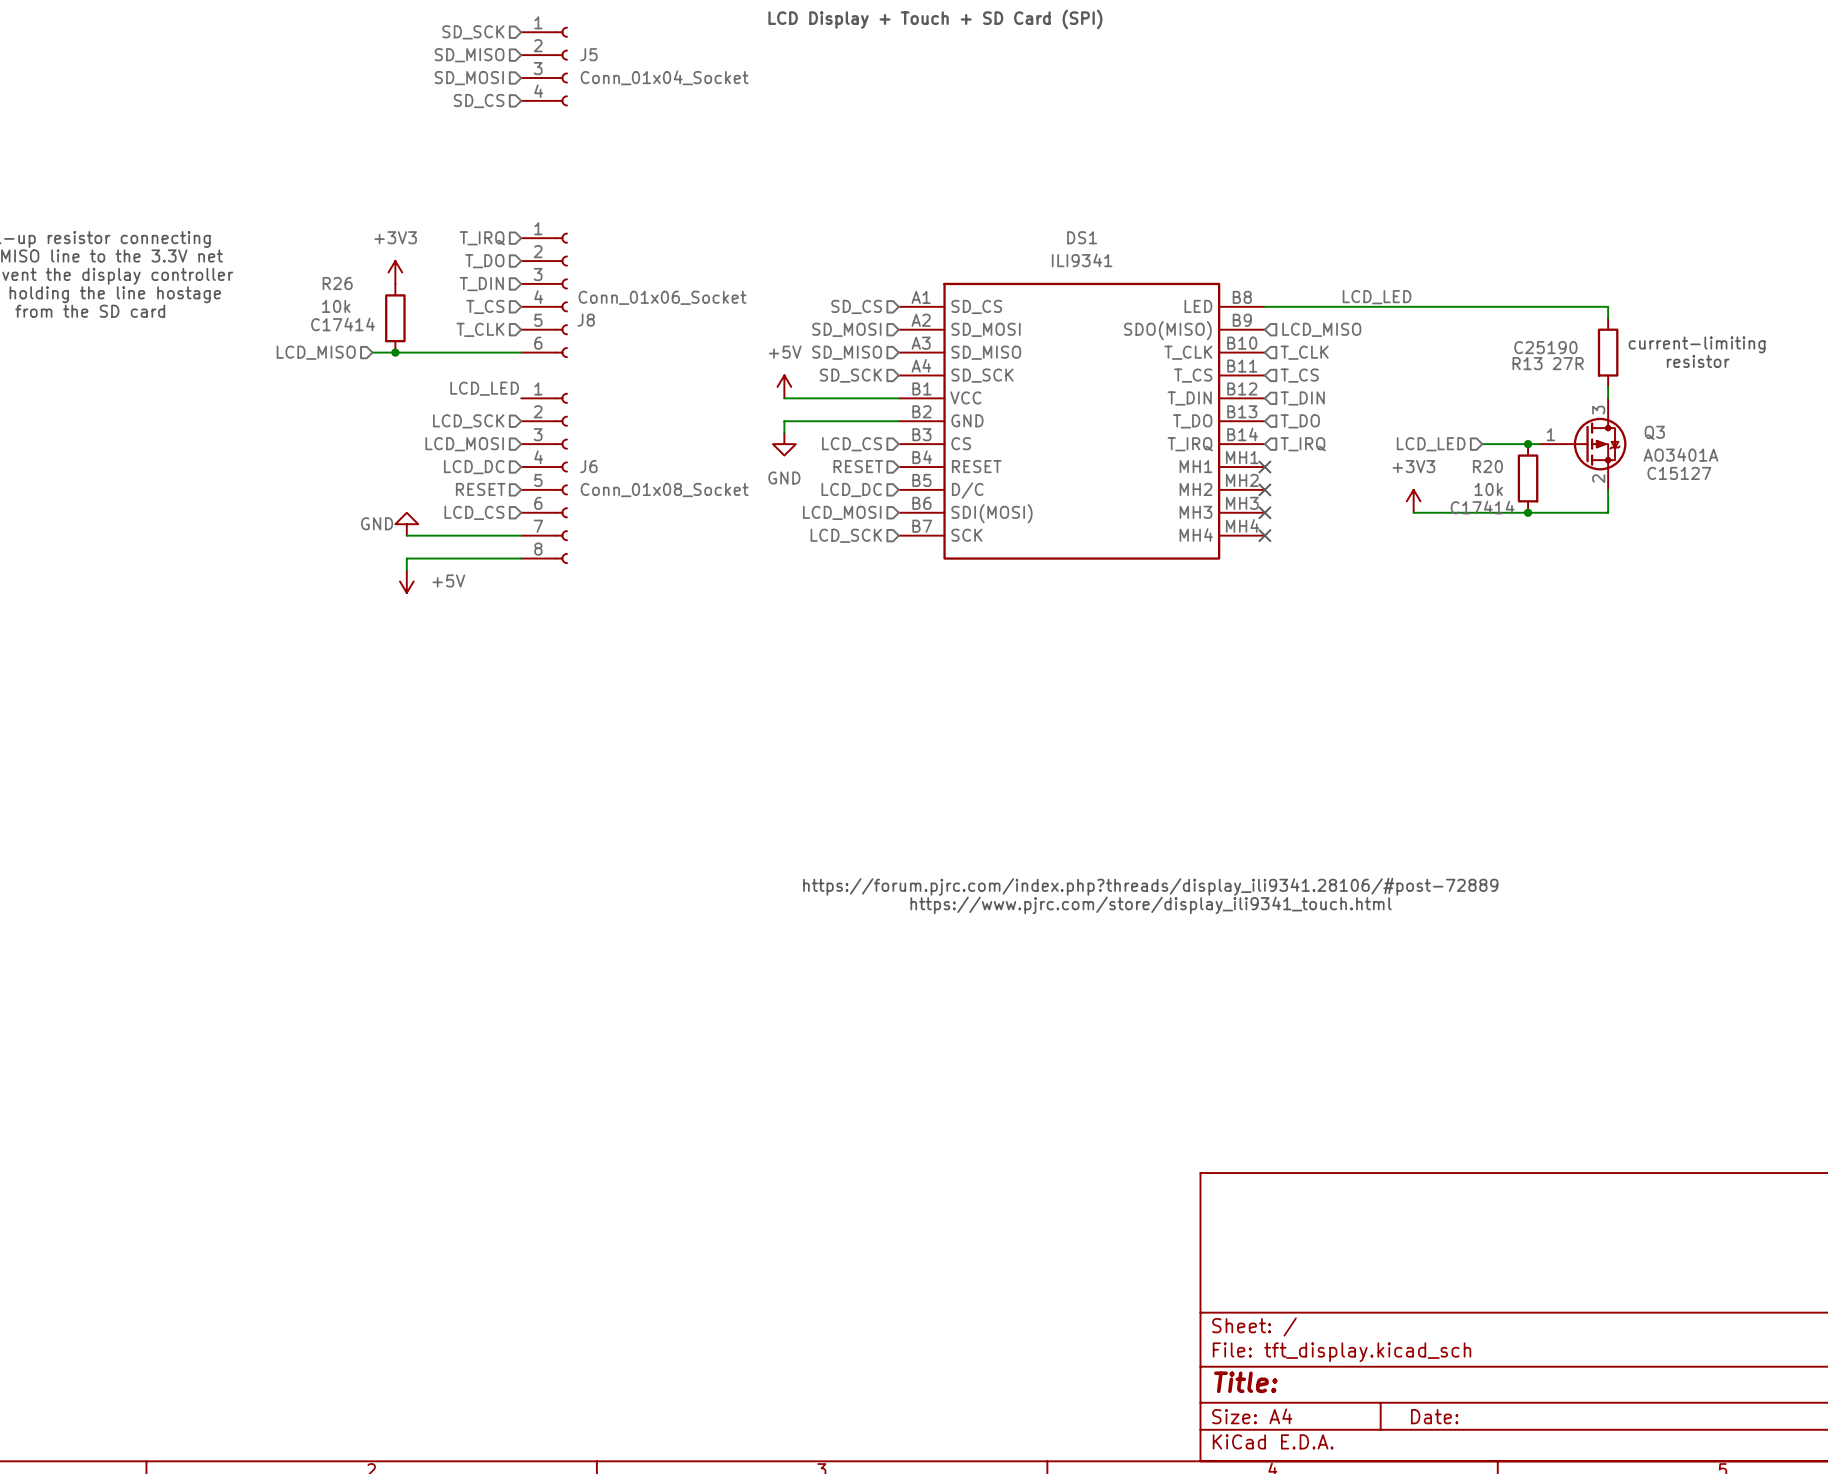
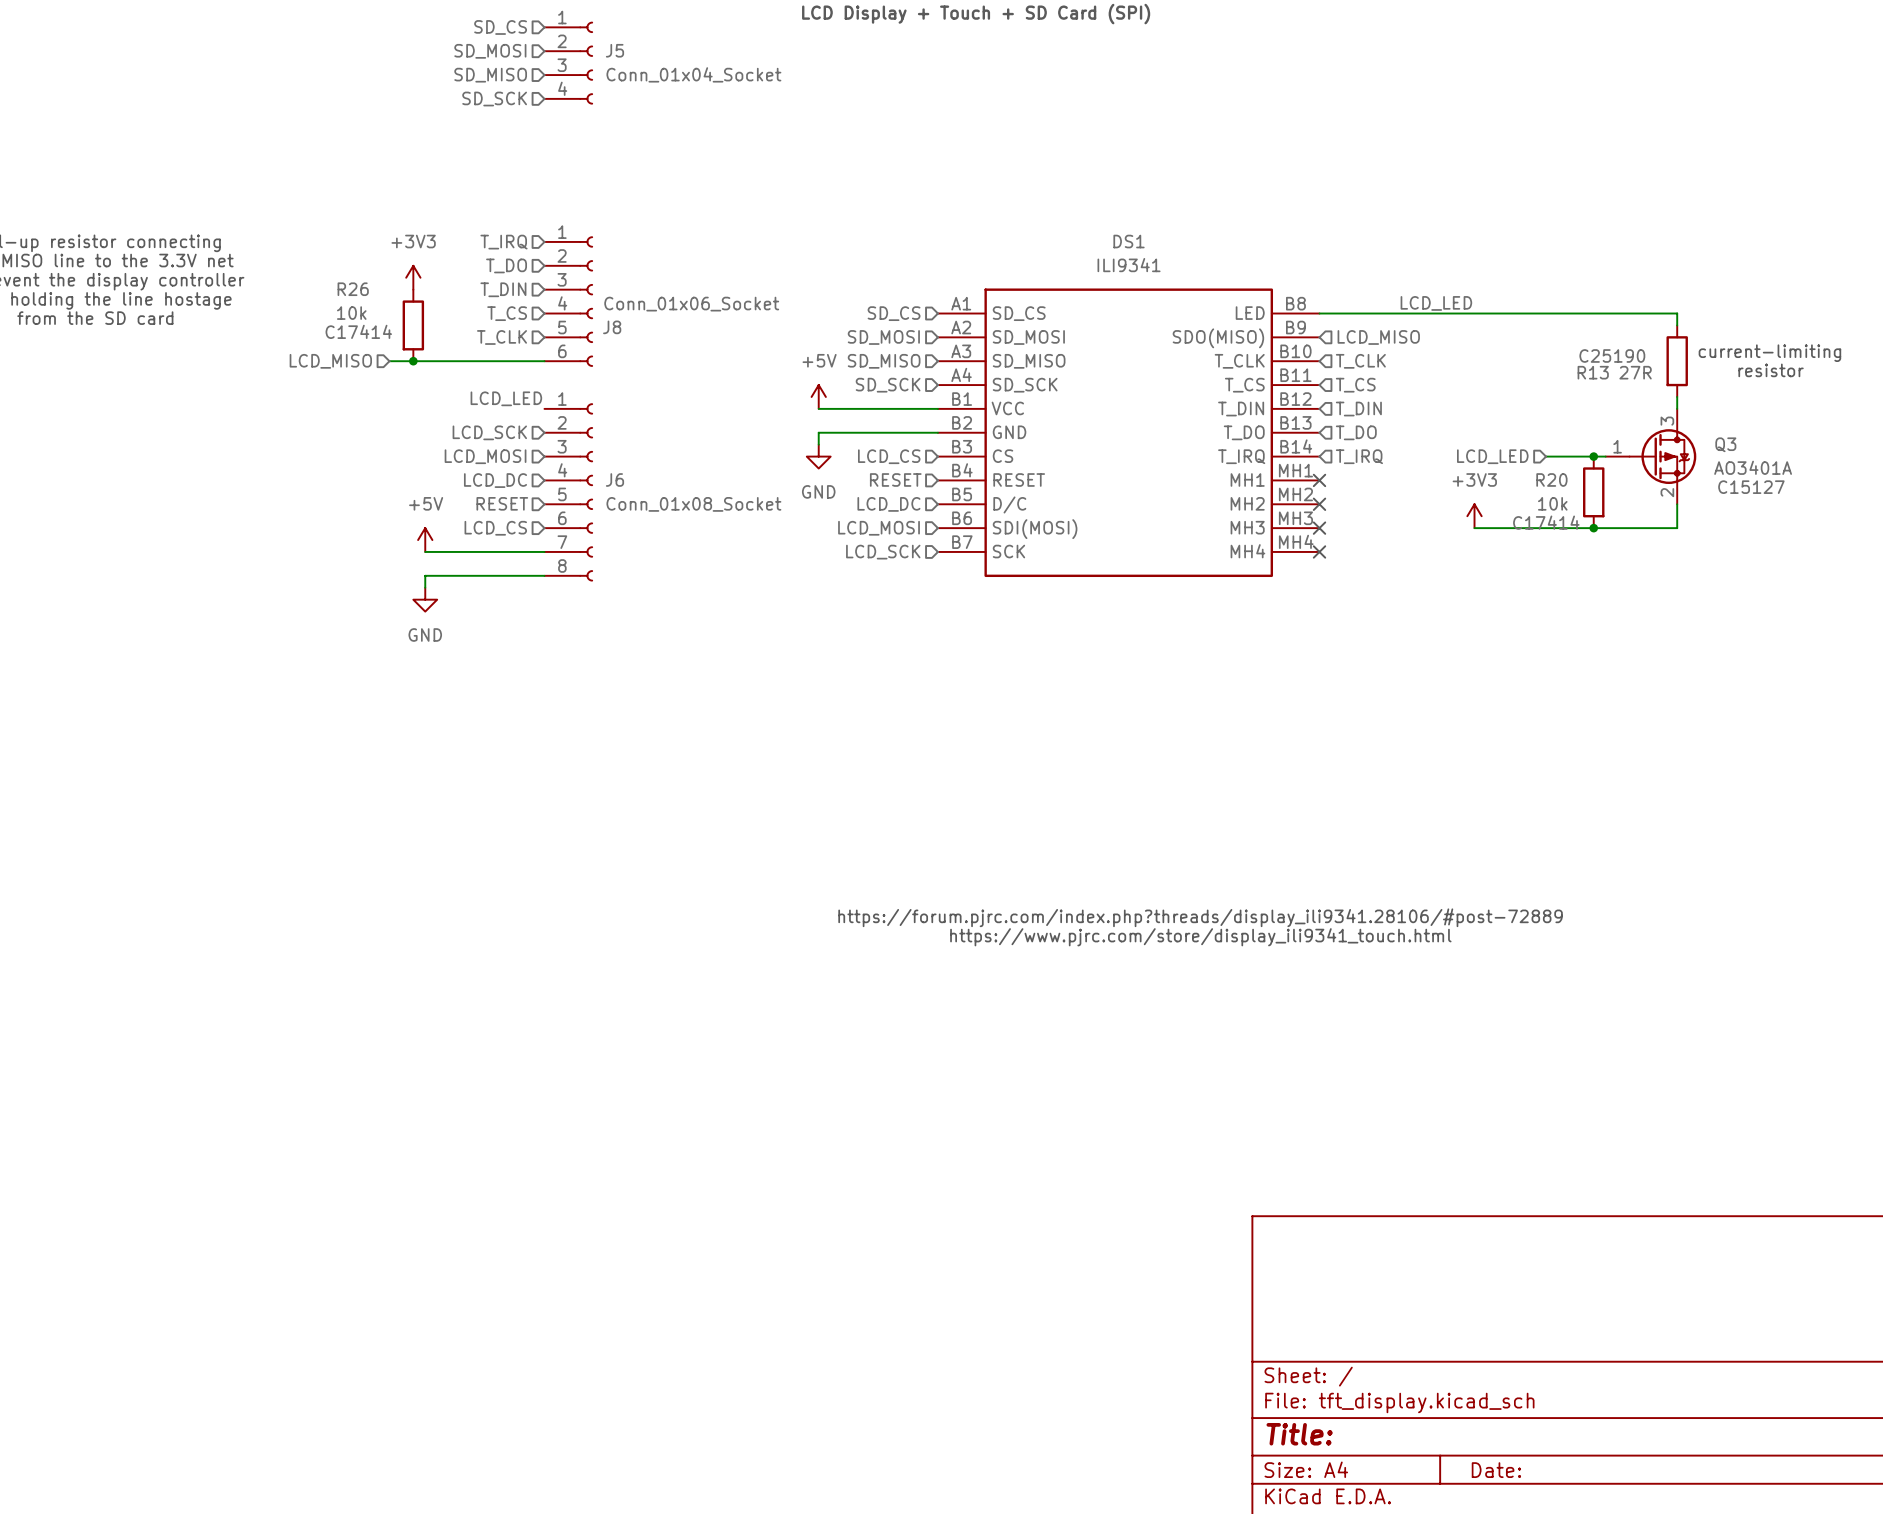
hierarchical label: SD_SCK (473, 32) -> SD_CS (500, 27)
hierarchical label: SD_MISO (469, 55) -> SD_MOSI (490, 51)
hierarchical label: SD_MOSI (469, 78) -> SD_MISO (490, 75)
hierarchical label: SD_CS (479, 101) -> SD_SCK (494, 99)
power symbol: GND (406, 524) -> +5V (425, 540)
power symbol: +5V (406, 581) -> GND (425, 599)

